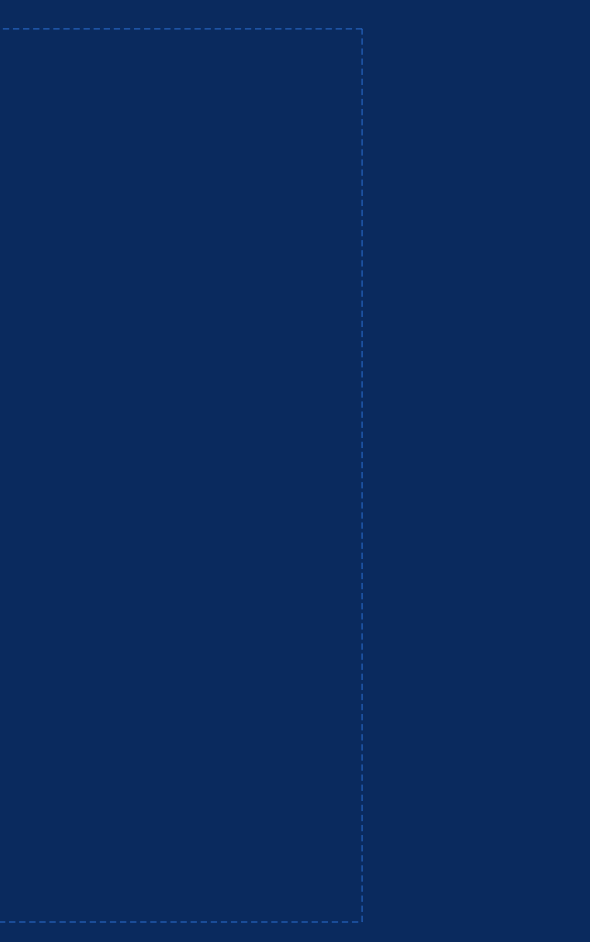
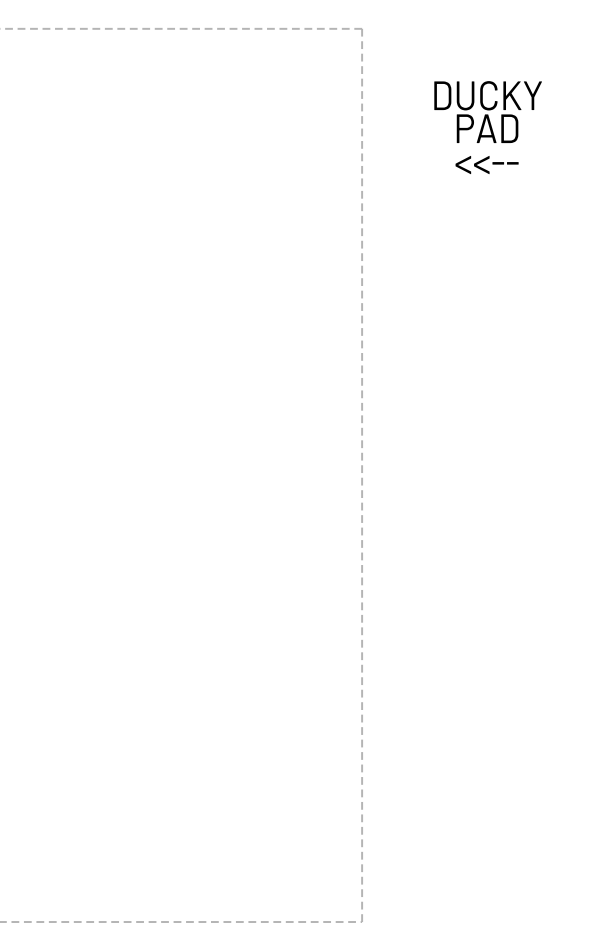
text: none -> DUCKY (488, 95)
text: none -> PAD (487, 128)
text: none -> <<-- (487, 165)

